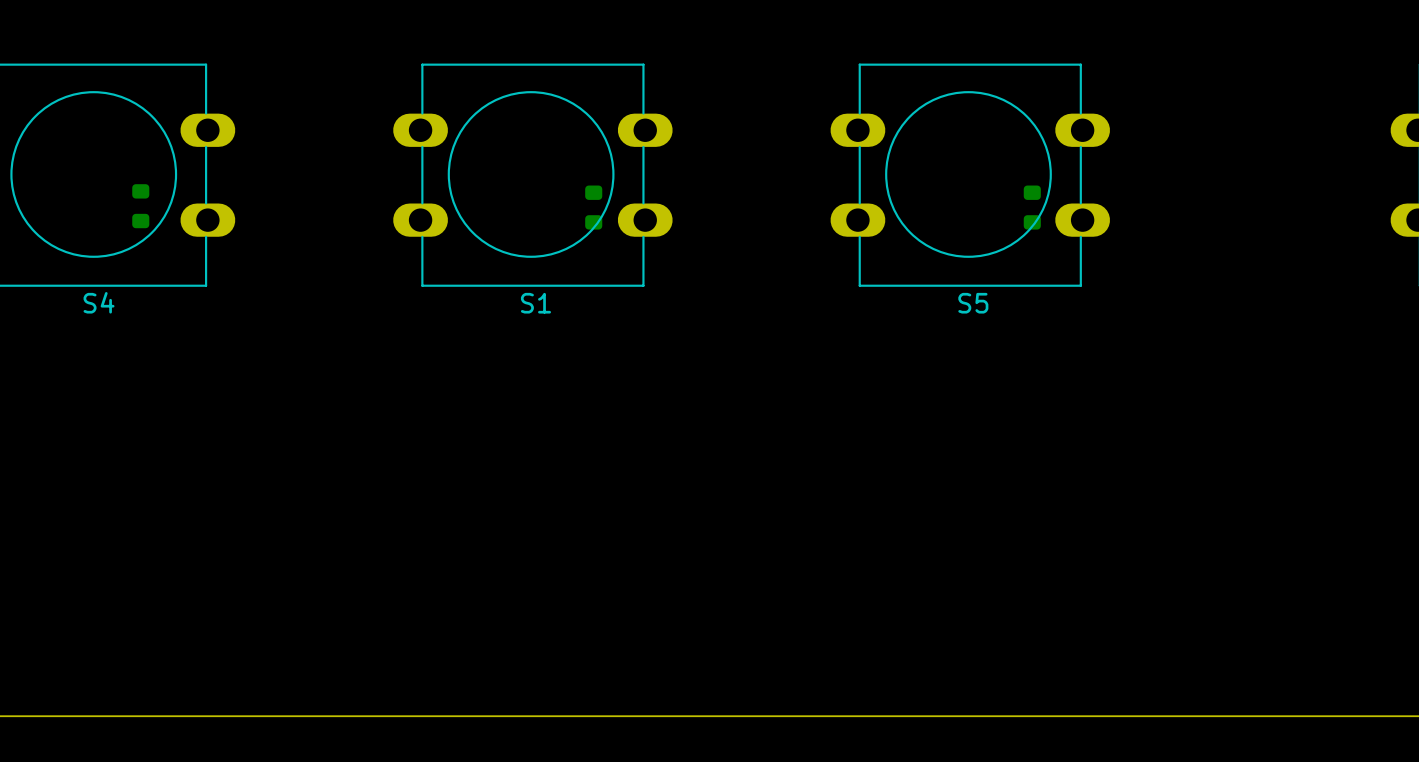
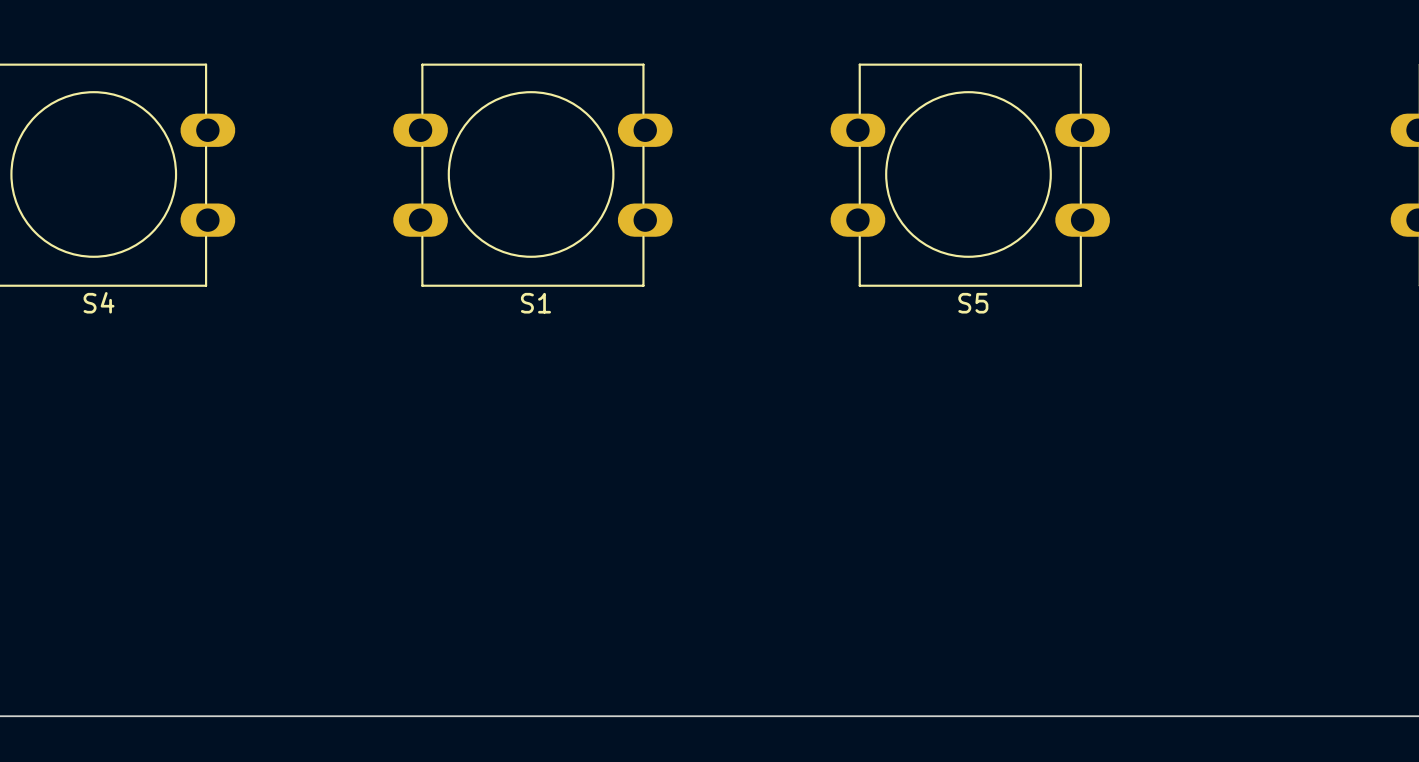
part: (140, 206) -> none
part: (593, 207) -> none
part: (1032, 207) -> none

